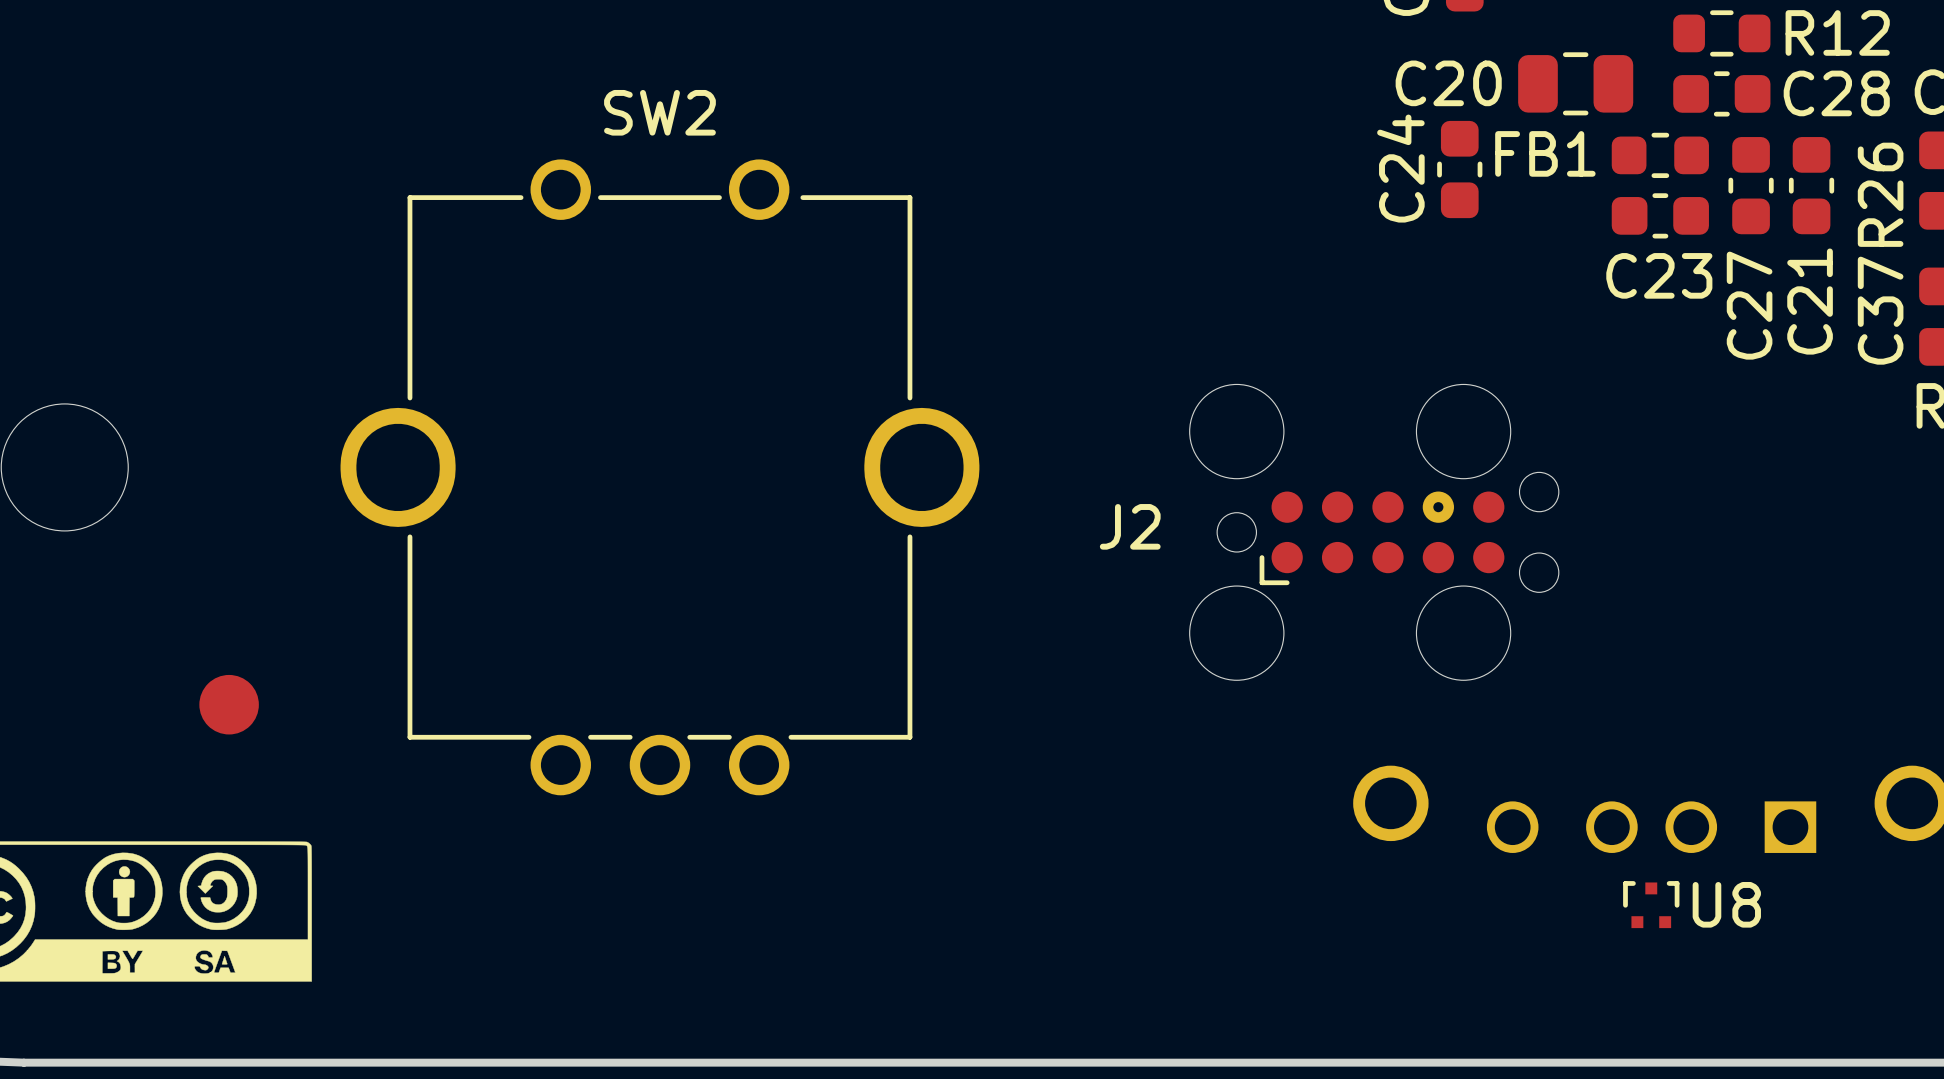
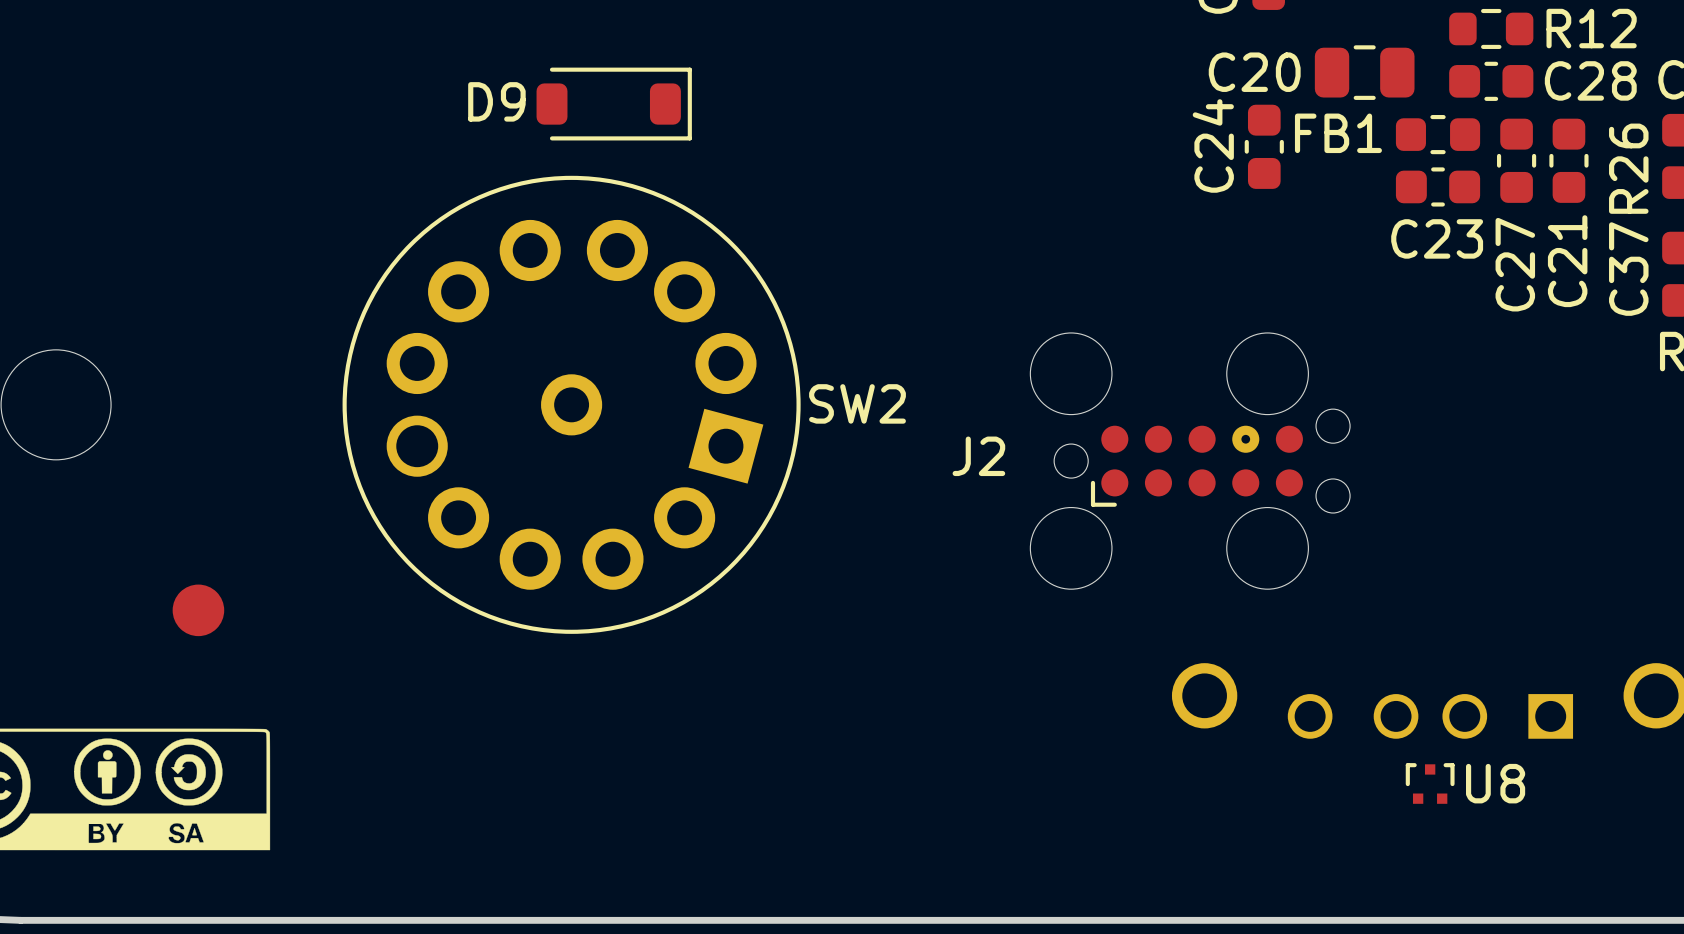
SW2 name position: SW2 (659, 112) -> SW2 (857, 403)
D9: none -> (614, 104)
SW2 footprint: [340, 159, 980, 796] -> [342, 175, 801, 634]

